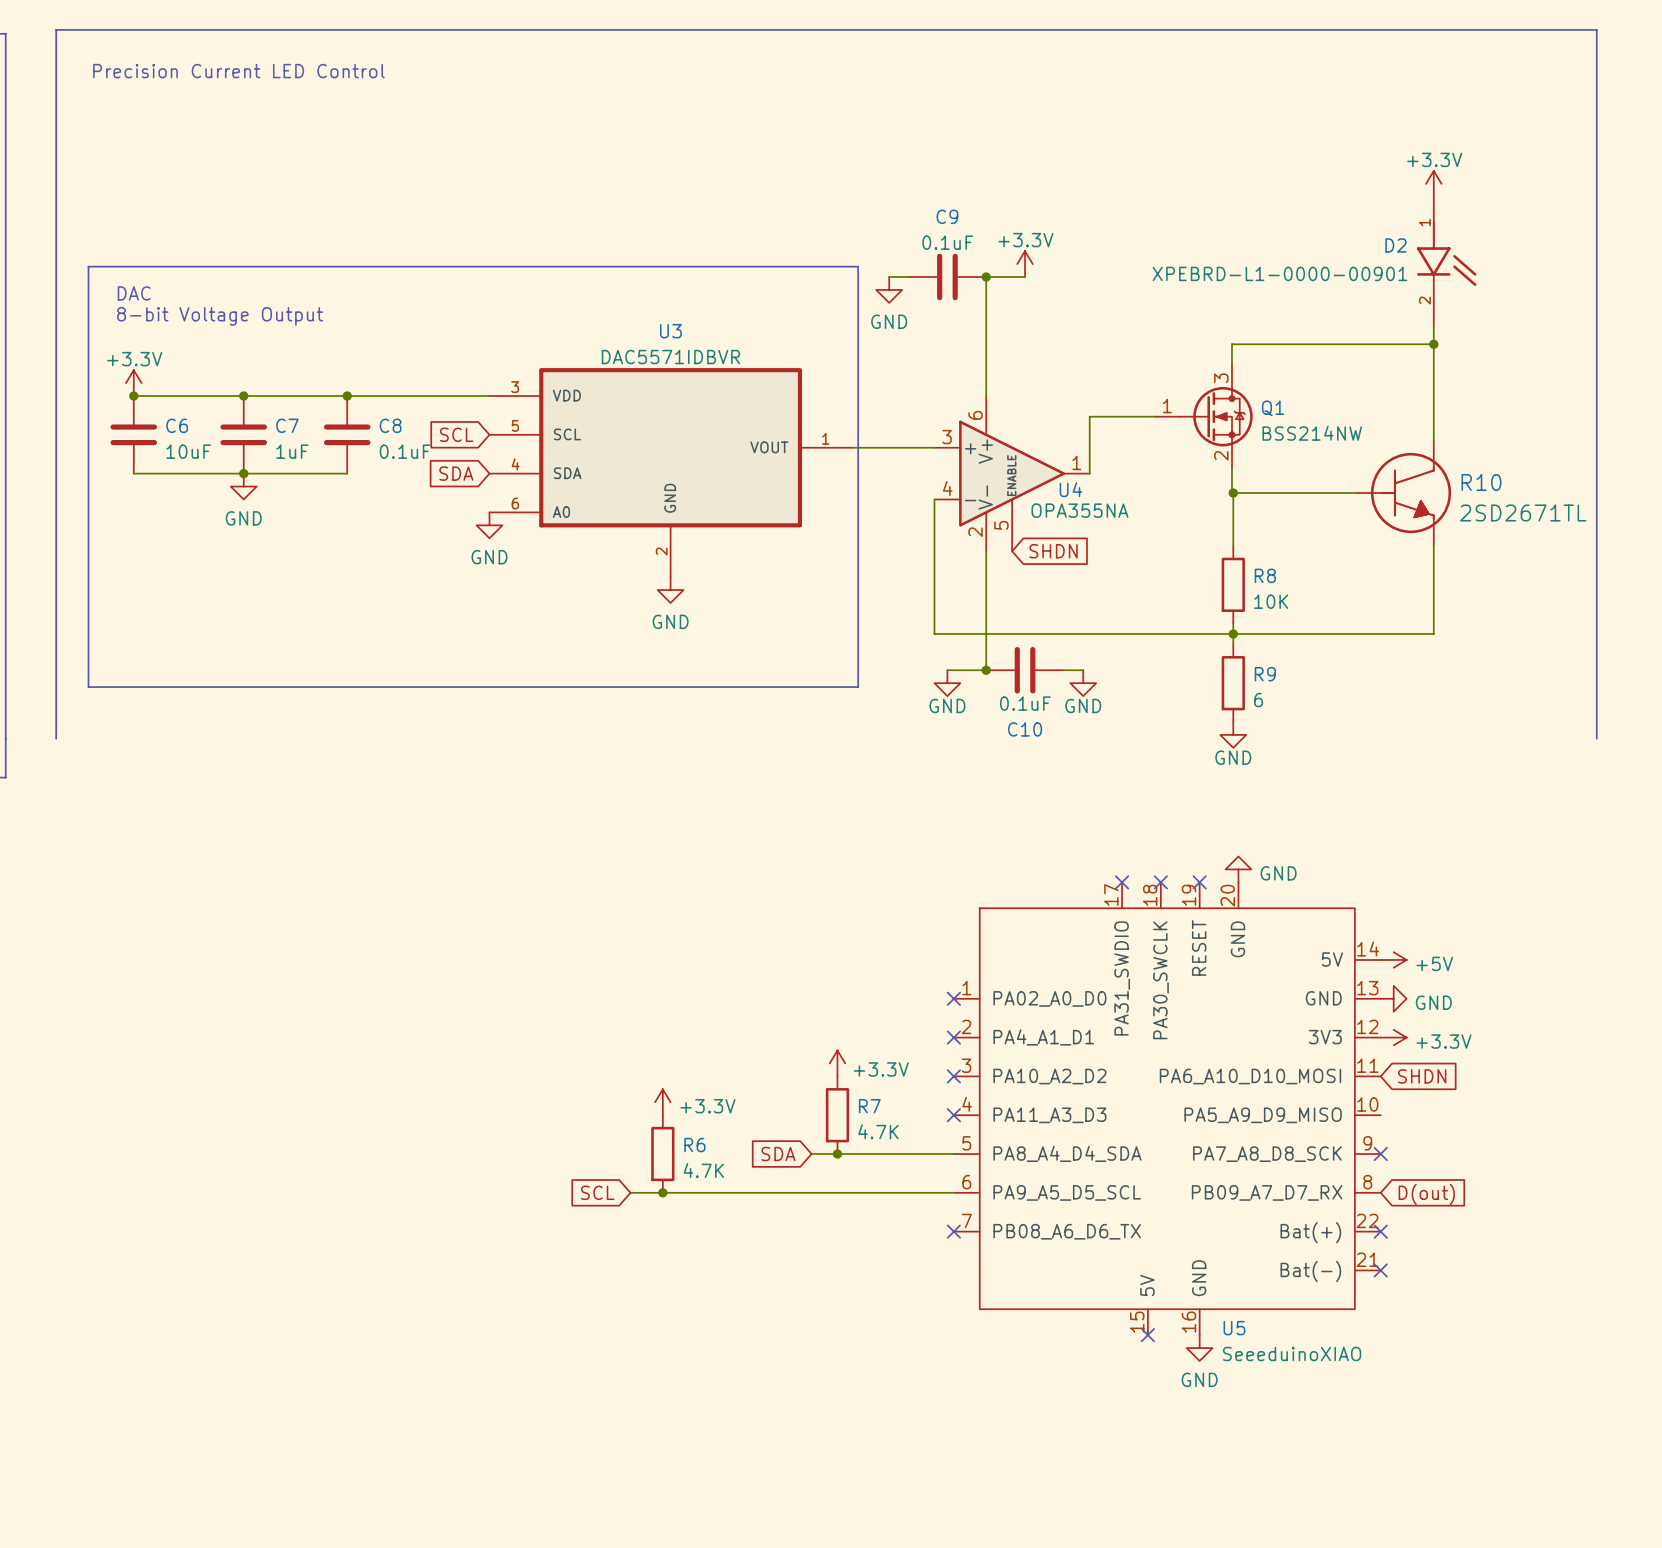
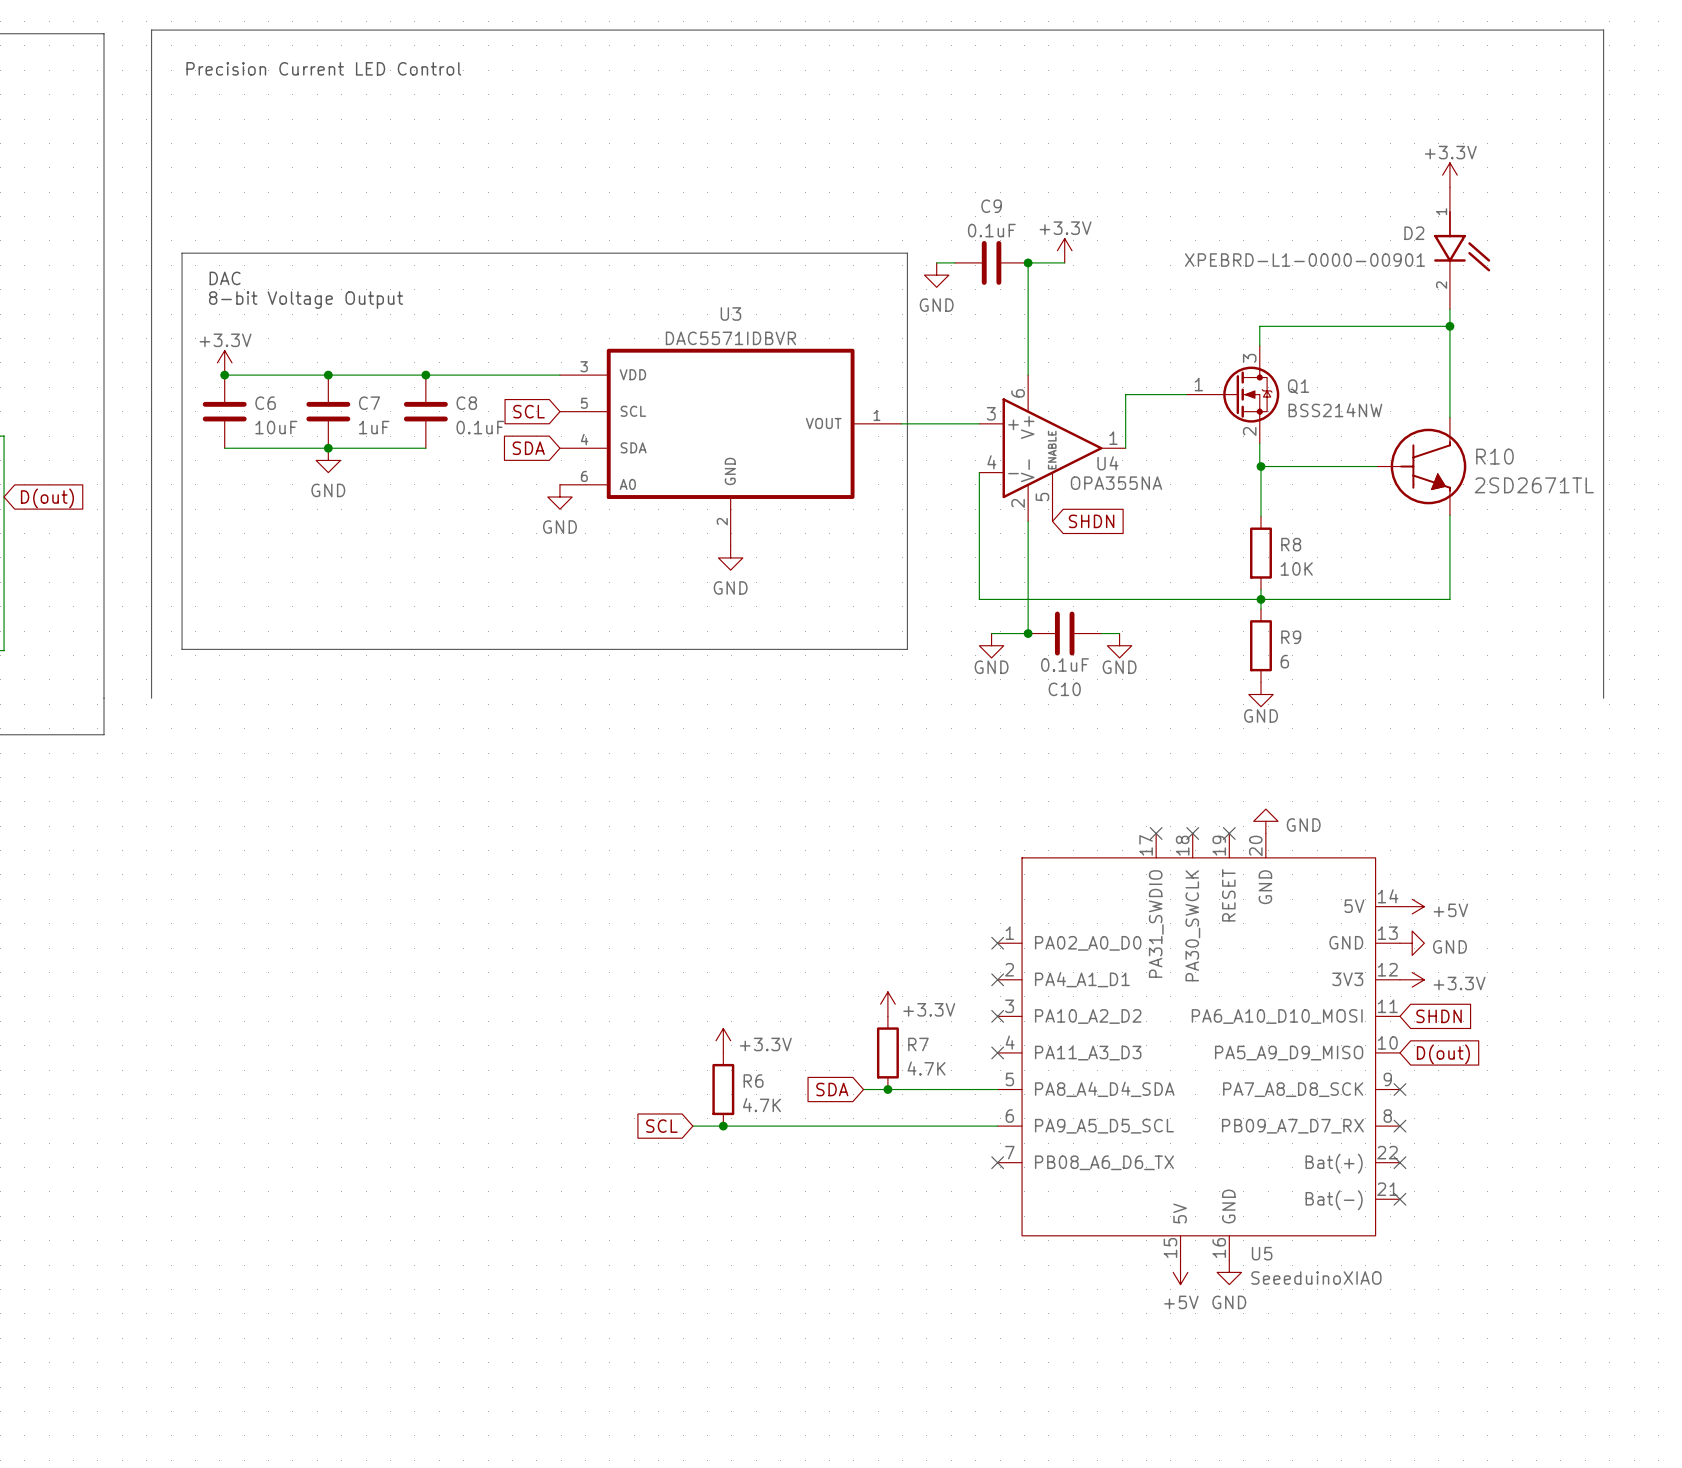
no-connect mark: none -> (1399, 1126)
global label position: D(out) (1426, 1194) -> D(out) (1443, 1054)
no-connect mark: (1147, 1335) -> none
power symbol: none -> +5V (1180, 1272)

